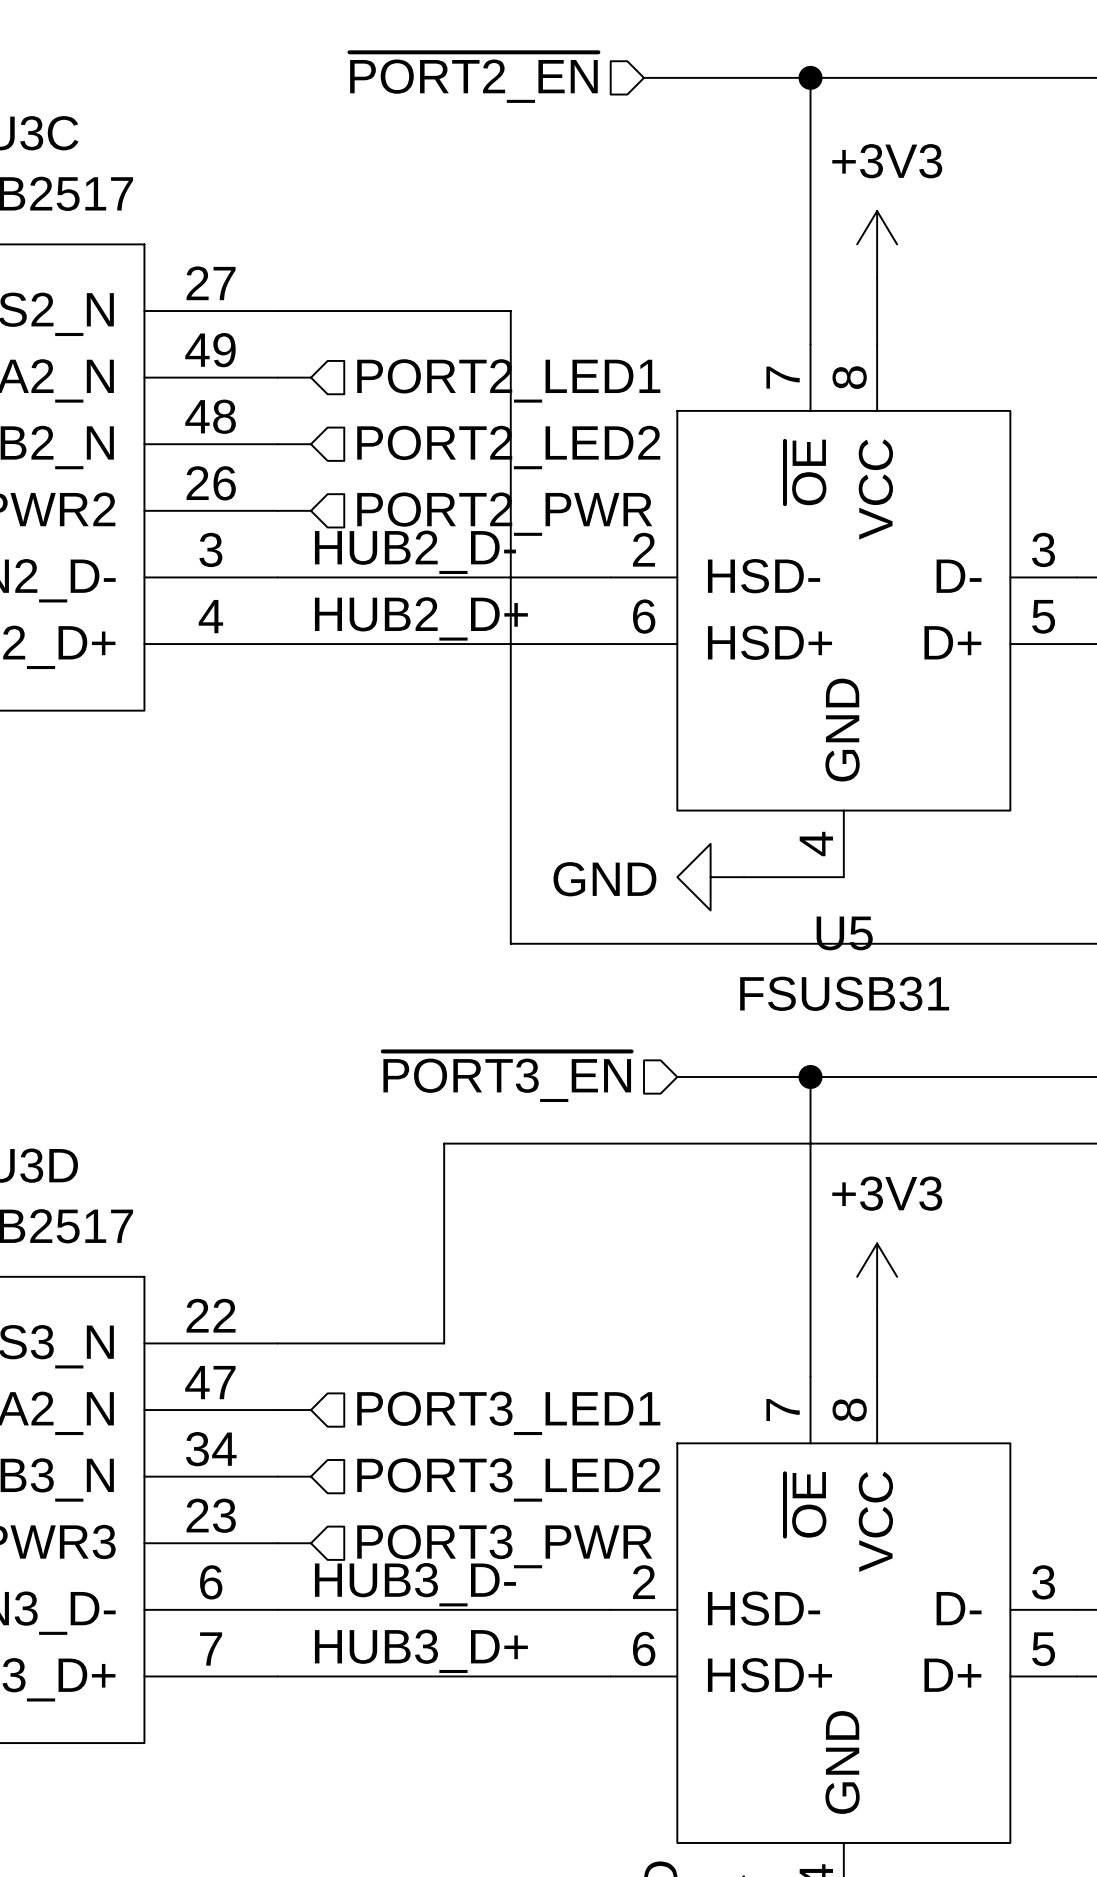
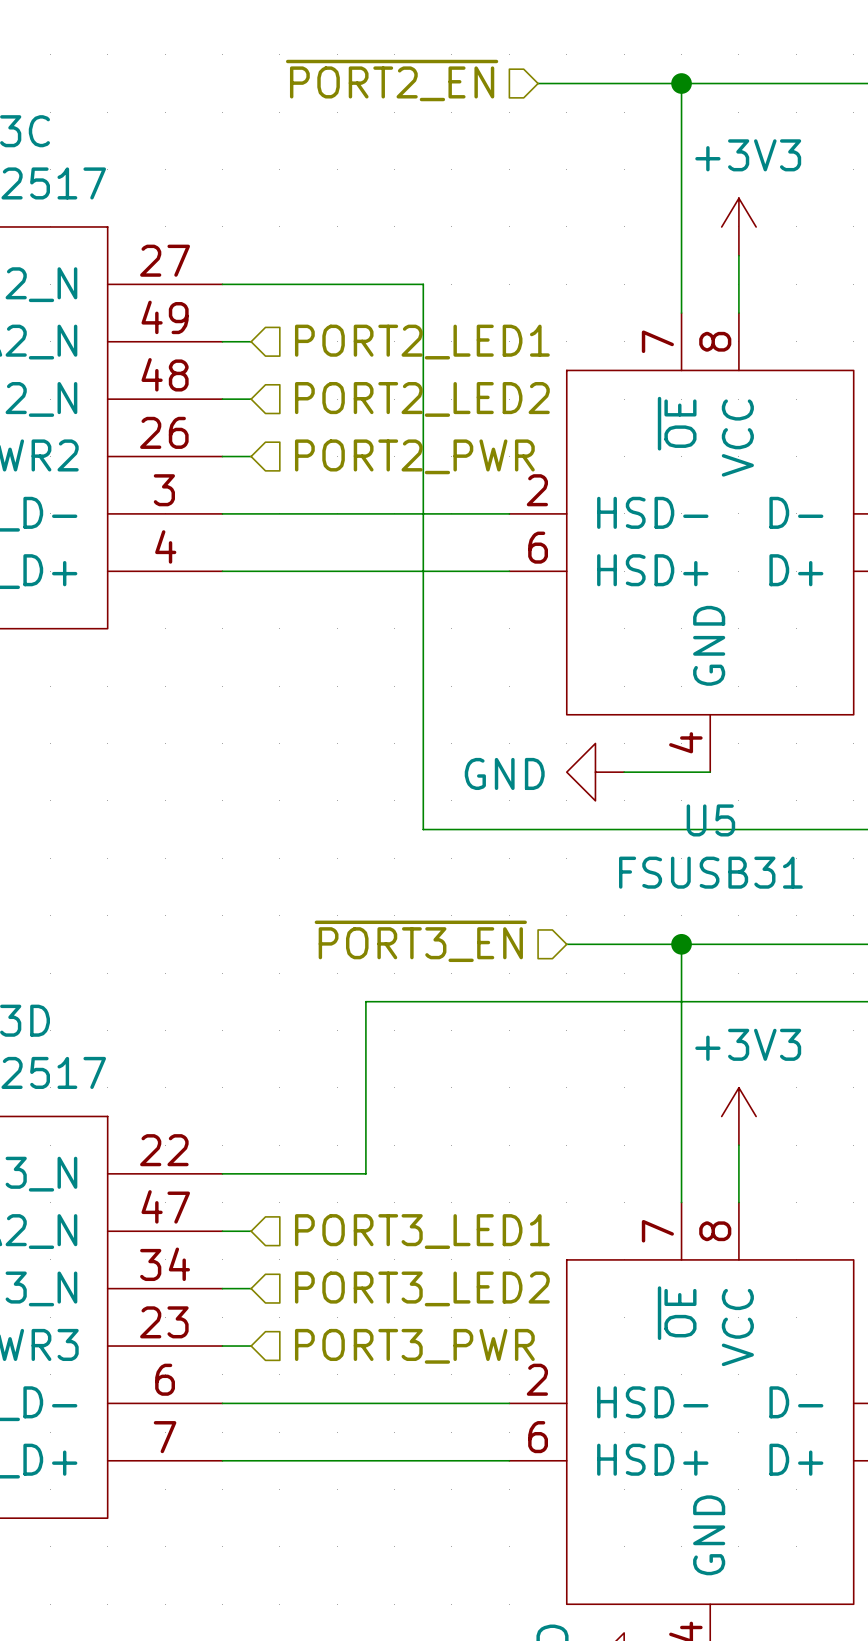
label: HUB2_D- (415, 552) -> none
label: HUB2_D+ (421, 618) -> none
label: HUB3_D- (415, 1584) -> none
label: HUB3_D+ (421, 1651) -> none

